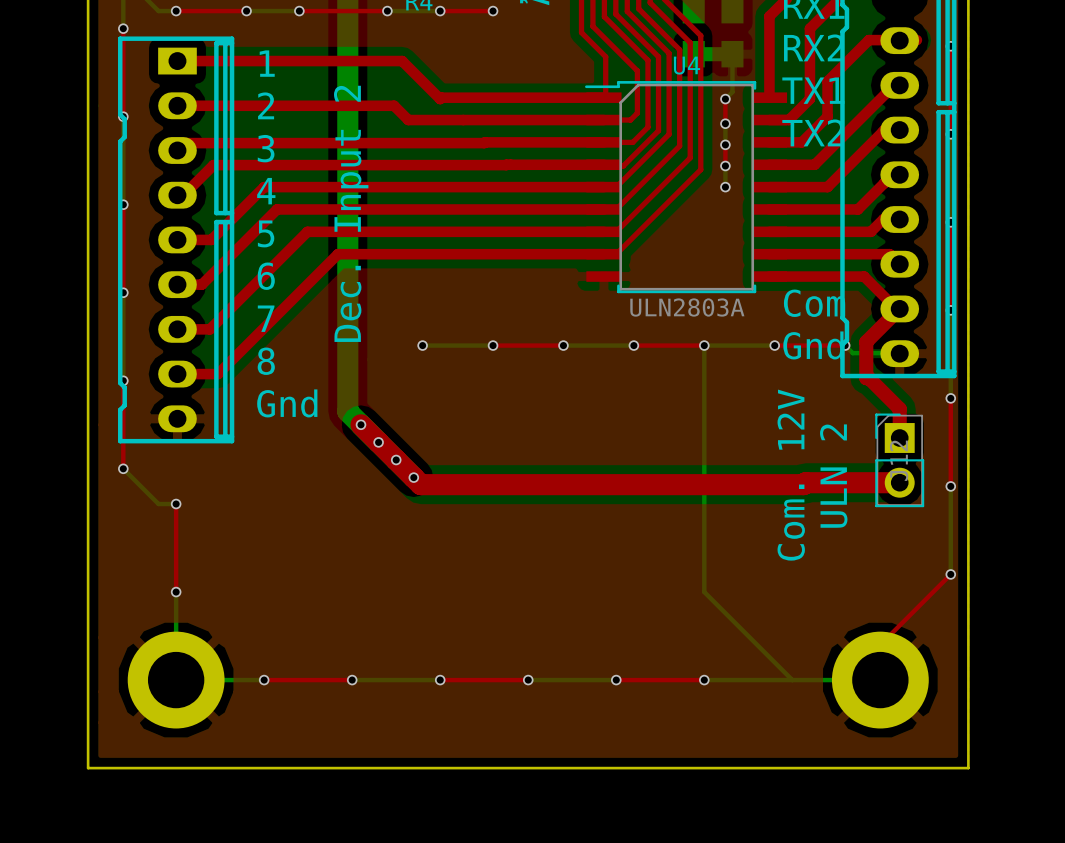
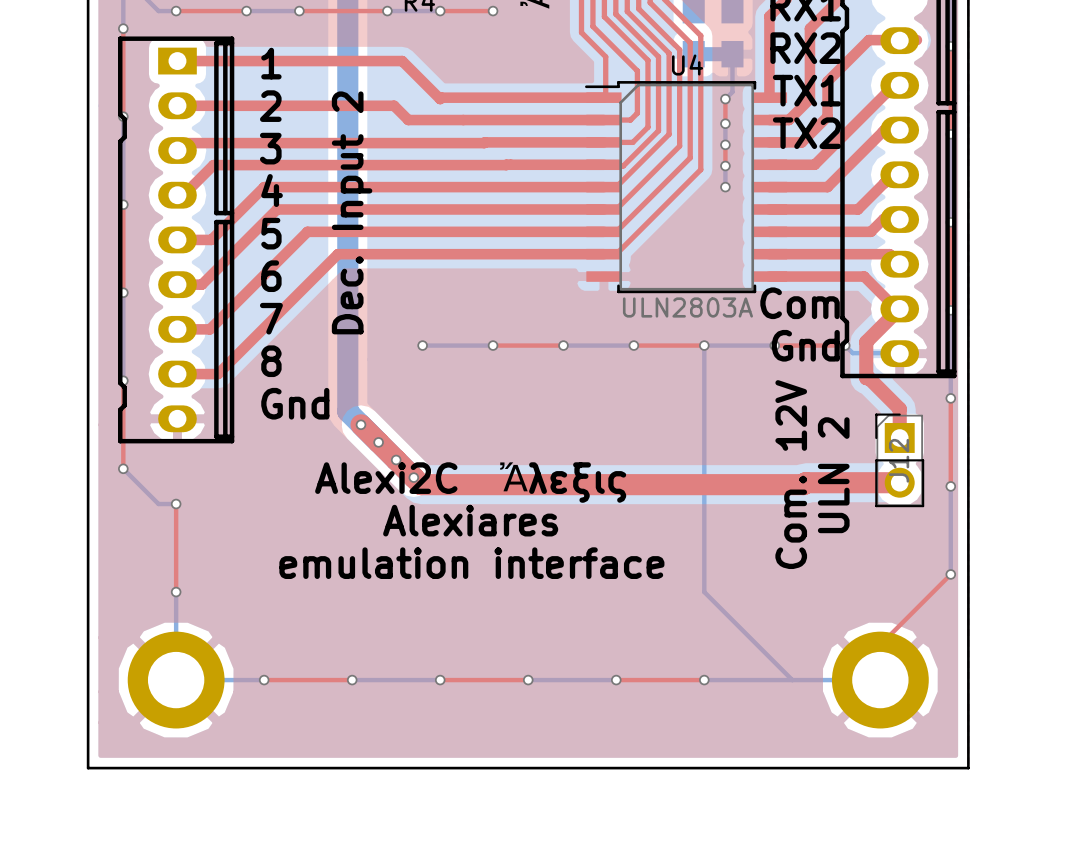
text: none -> Alexi2C Ἄλεξις (470, 481)
text: none -> Alexiares (470, 520)
text: none -> emulation interface (471, 563)

